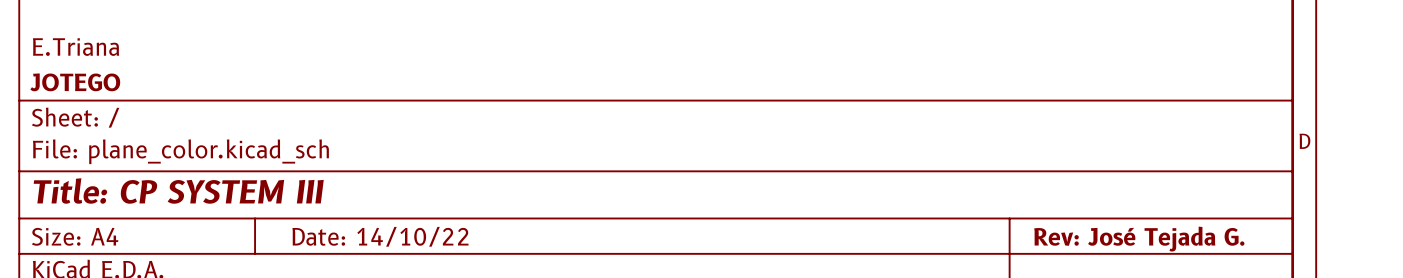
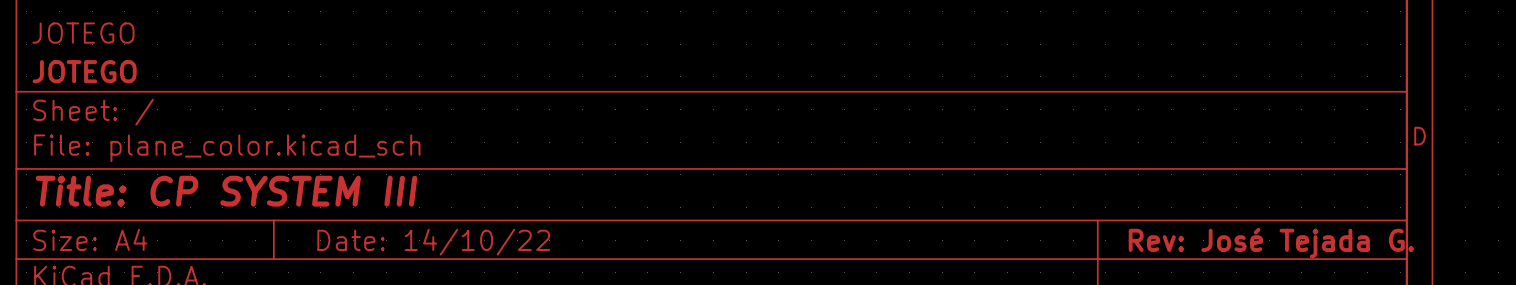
title block: E.Triana (76, 47) -> JOTEGO (83, 33)

